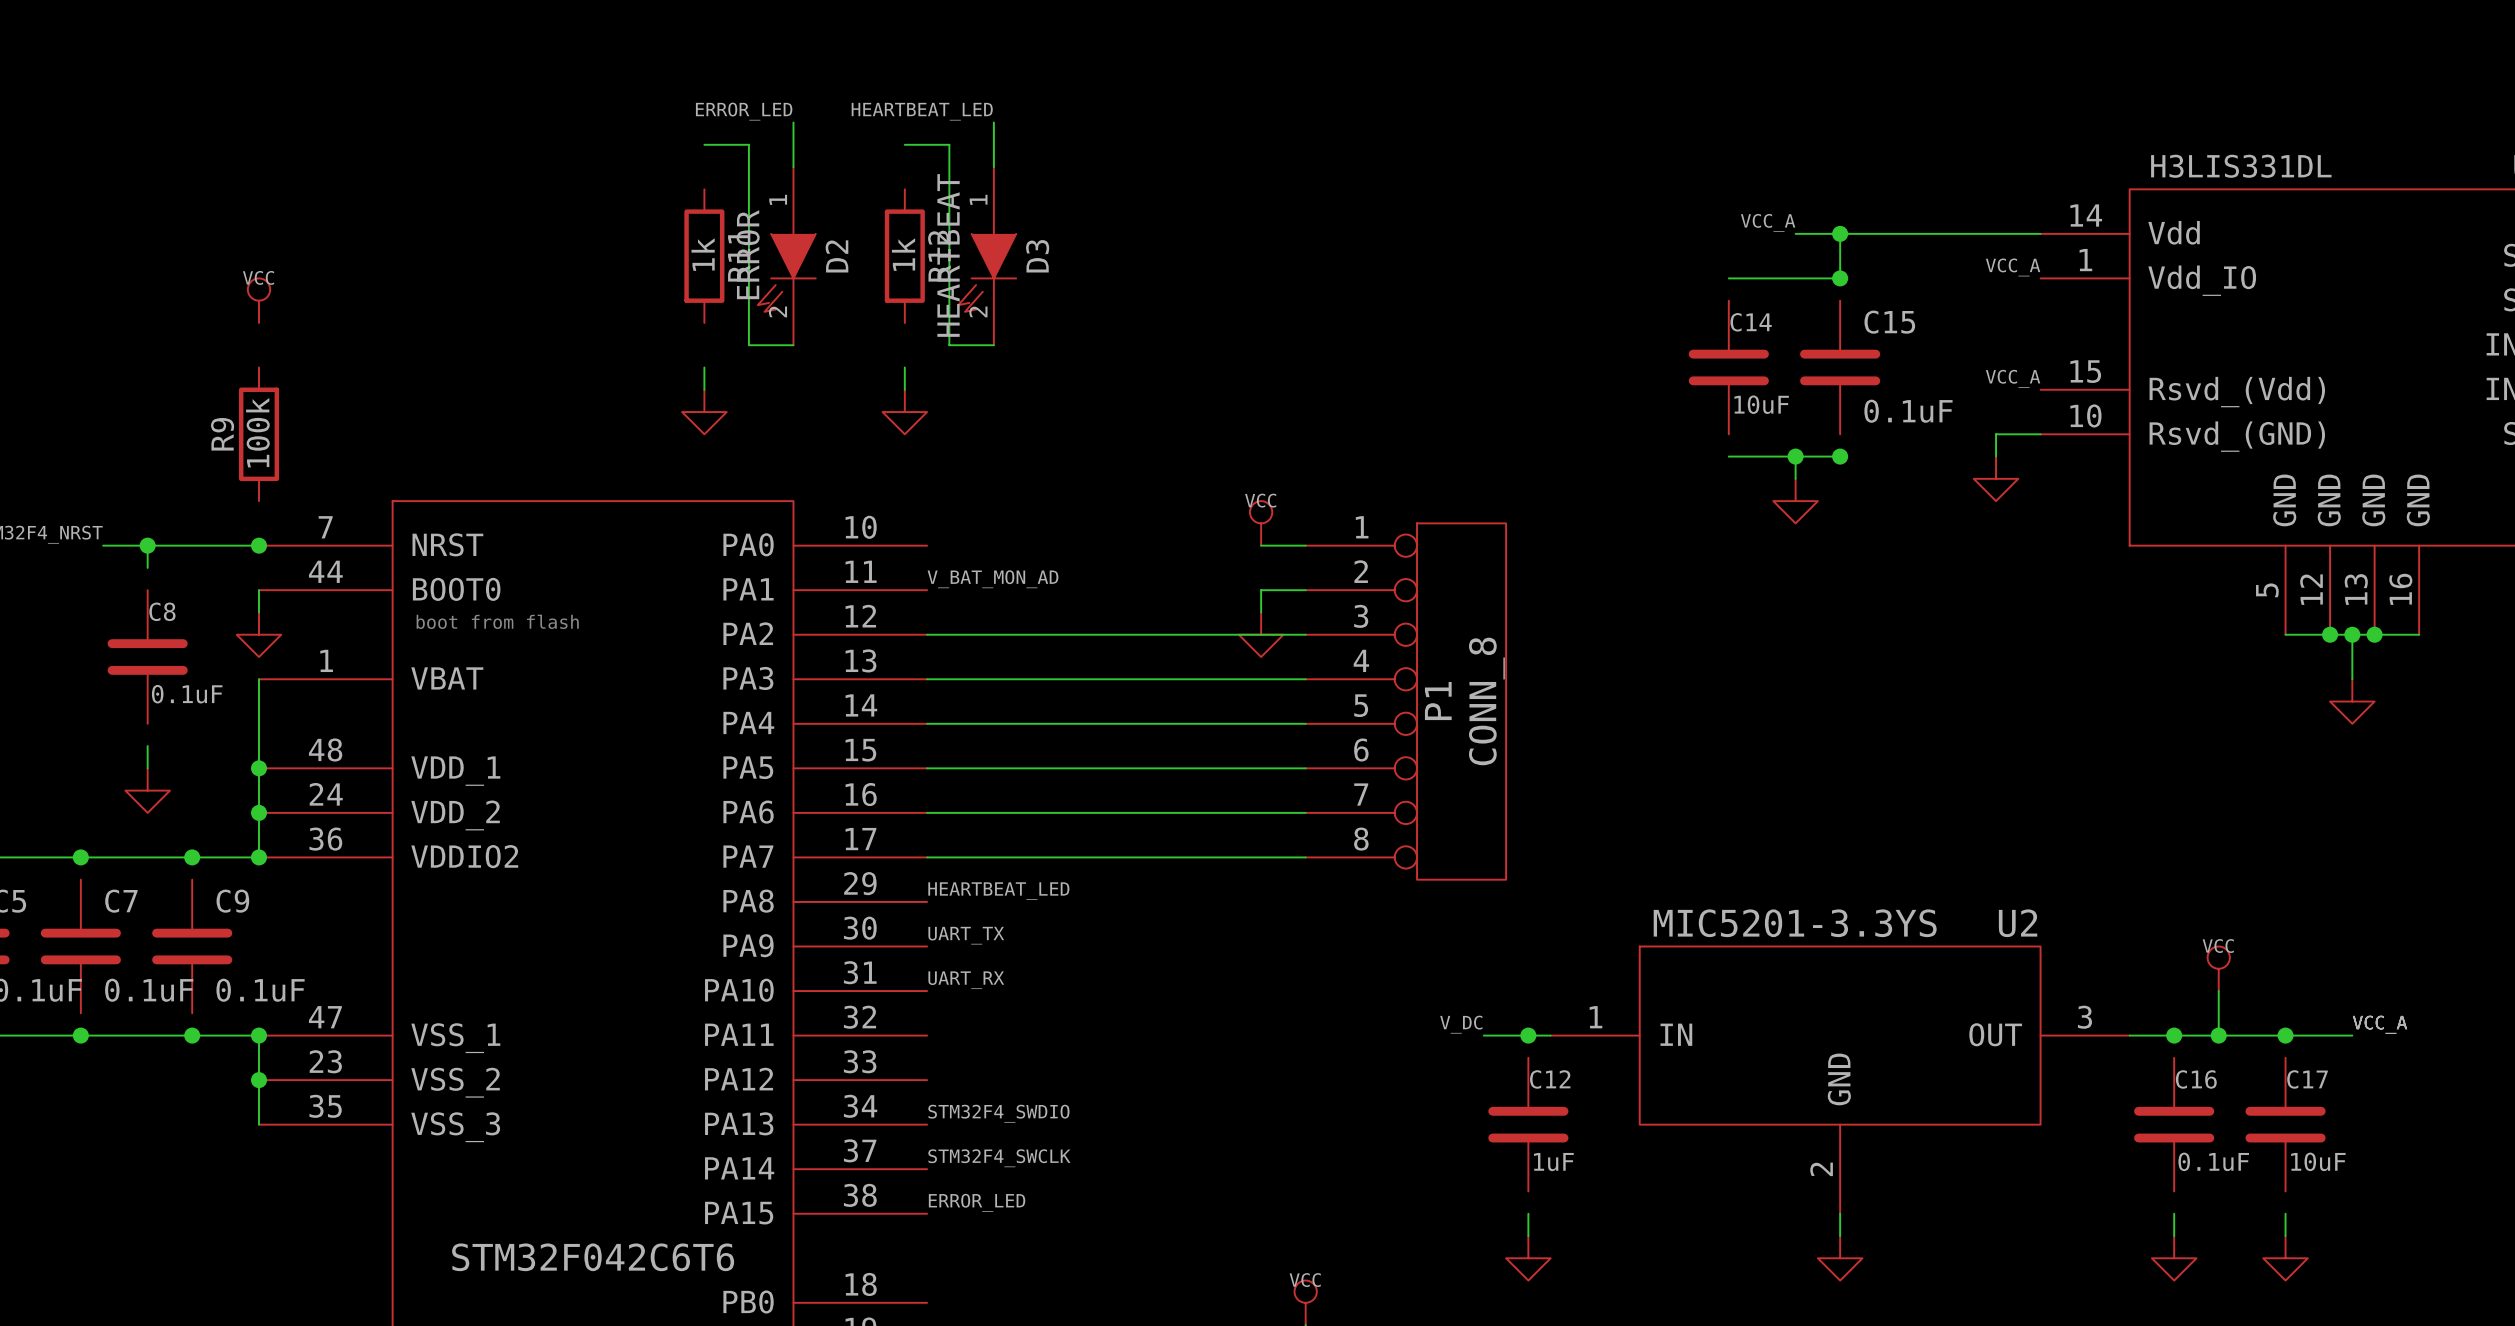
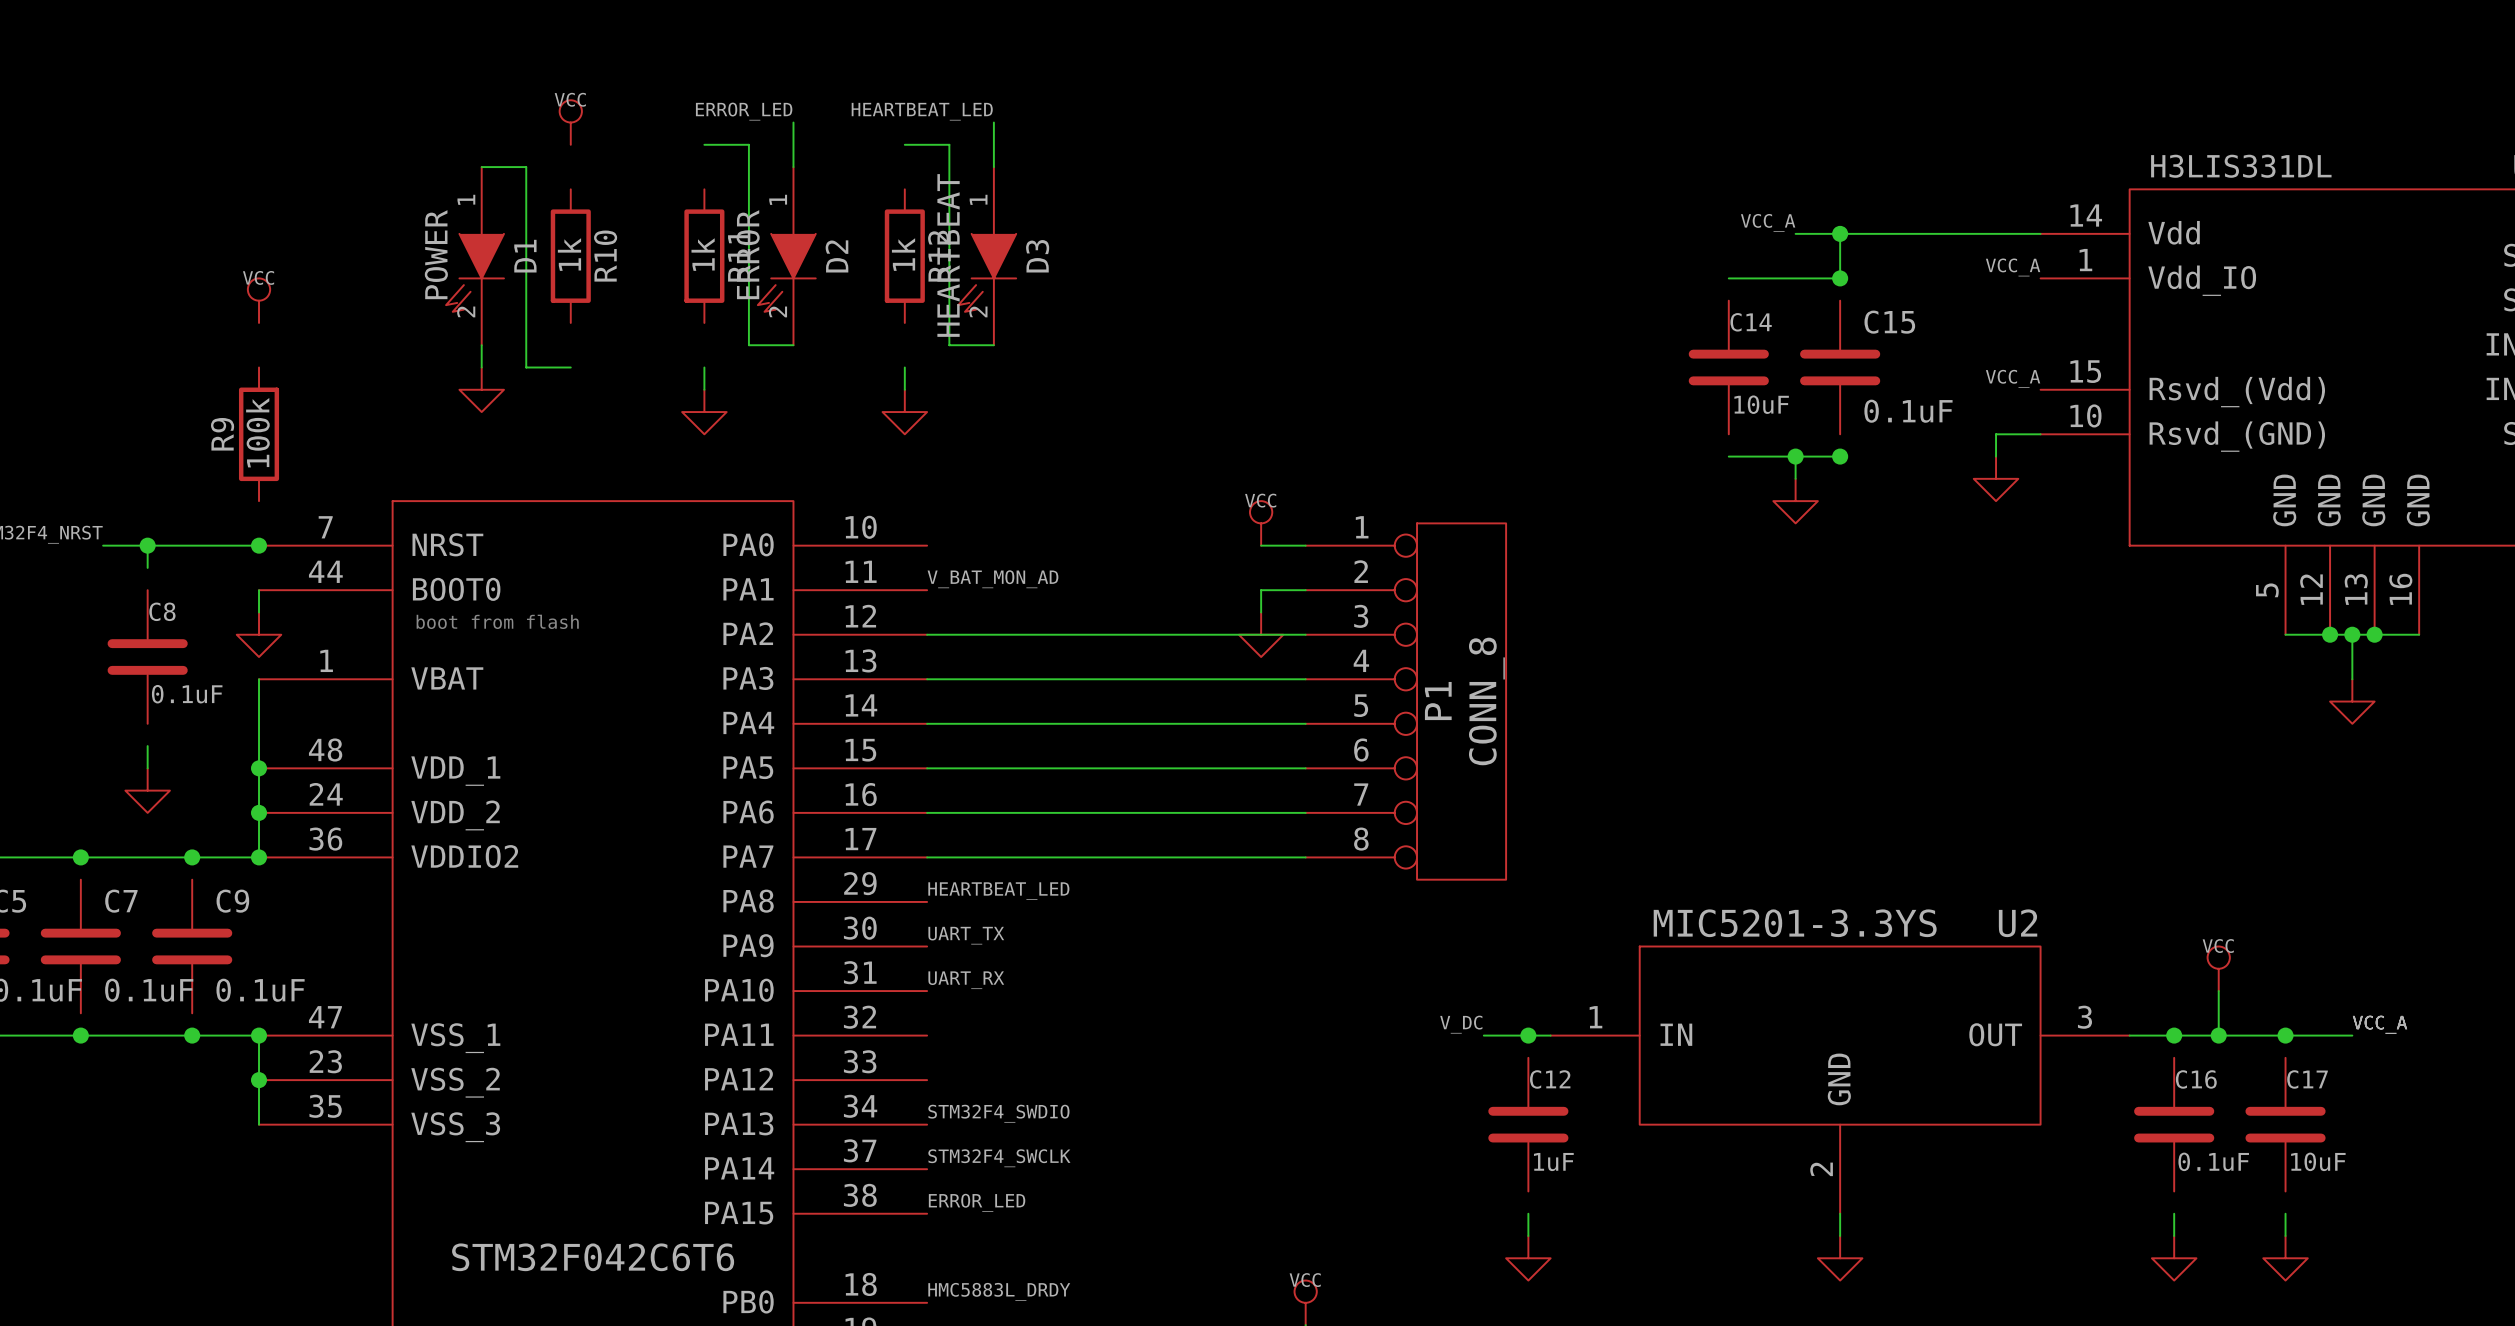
power symbol: none -> VCC (570, 122)
wire: none -> (481, 167) (526, 167) (526, 367) (570, 367)
D1: none -> POWER (475, 256)
R10: none -> 1k (570, 256)
wire: none -> (481, 345) (481, 367)
power symbol: none -> (481, 389)
label: none -> HMC5883L_DRDY (999, 1291)

